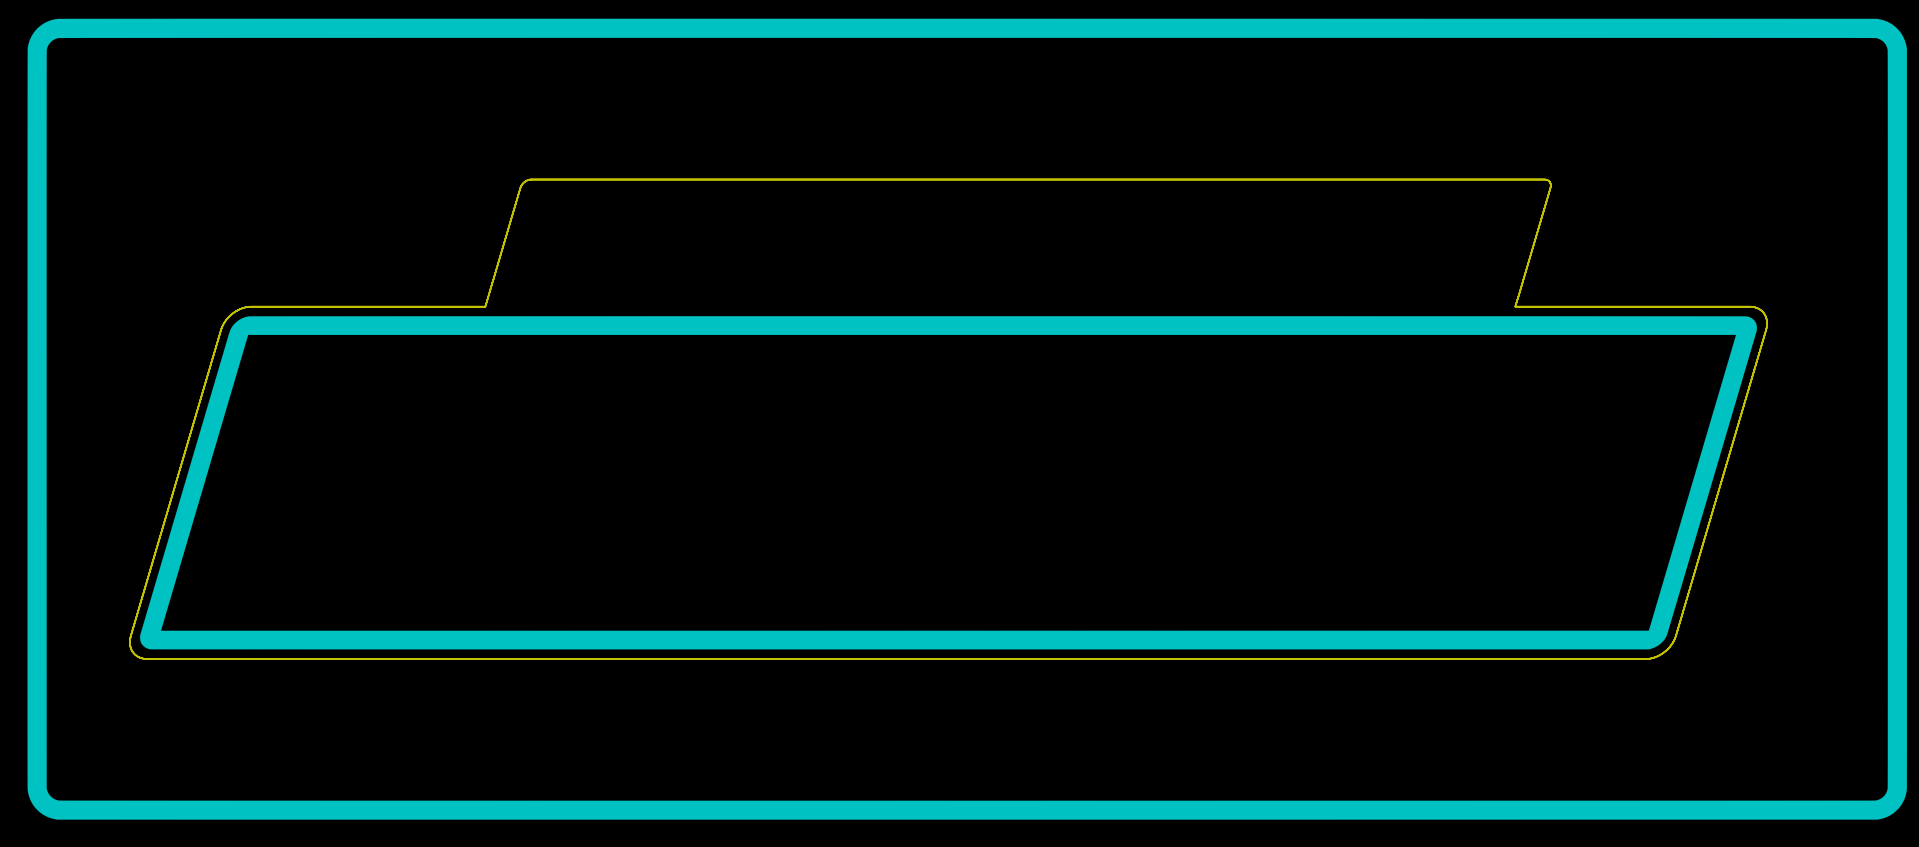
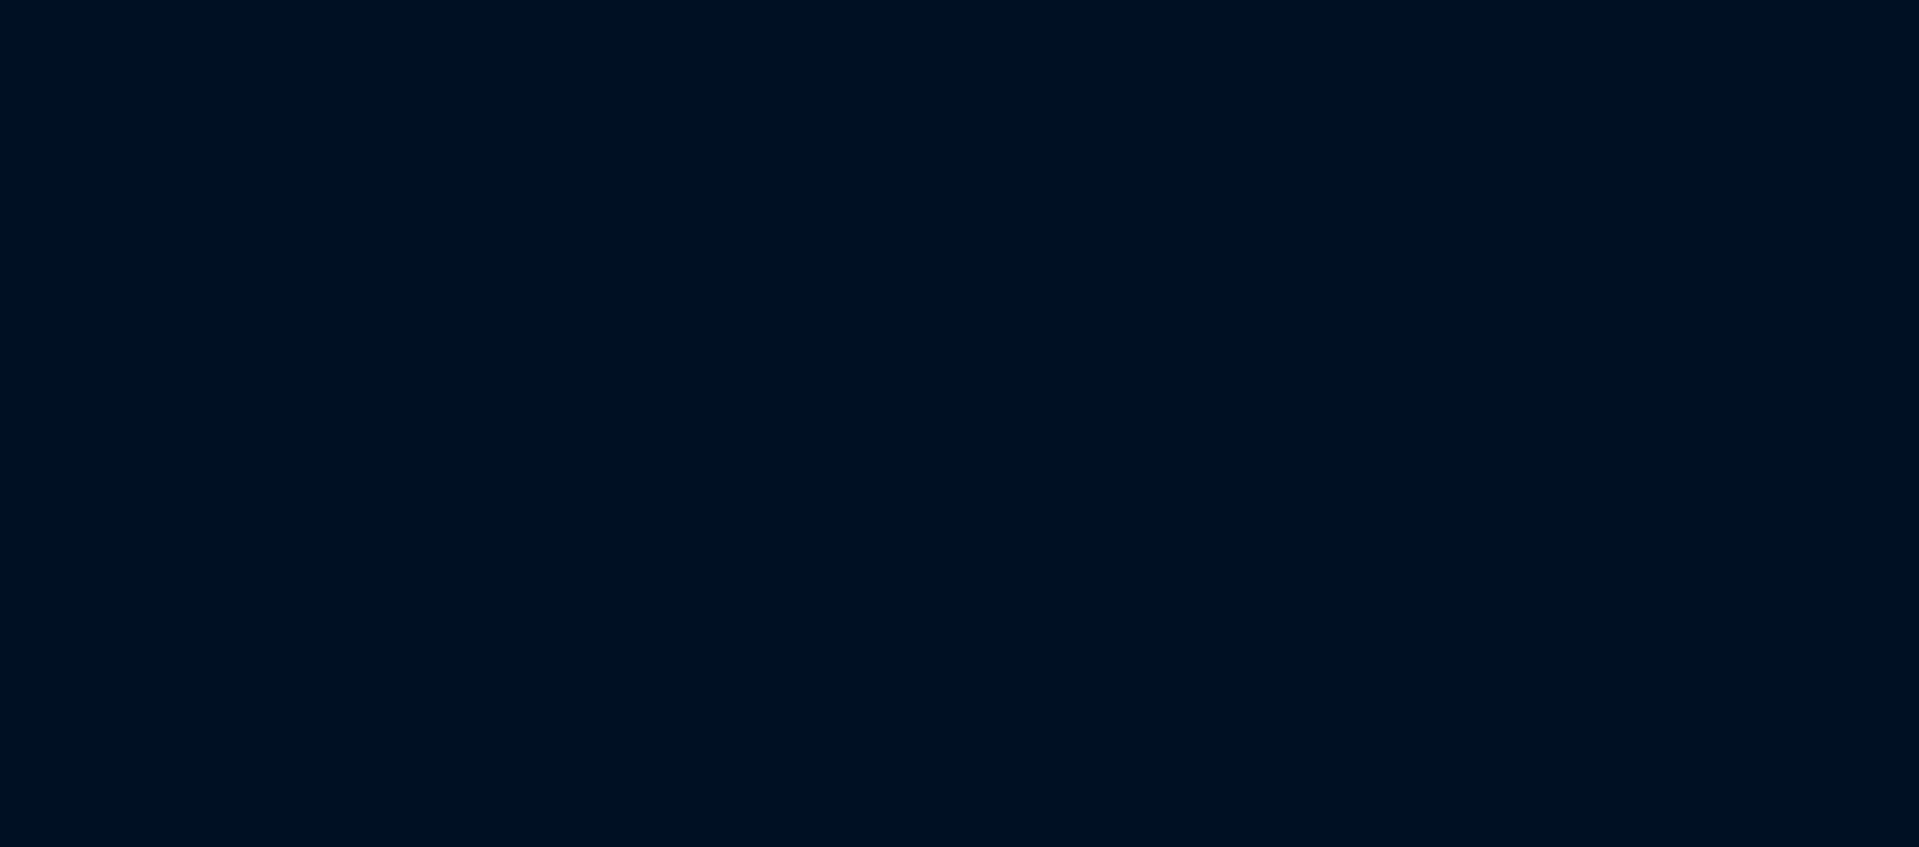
drawing: [27, 18, 1907, 820] -> none
board edge: (531, 179) (525, 181) (520, 187) (485, 306) (250, 306) (237, 310) (227, 318) (220, 330) (130, 636) (130, 646) (135, 655) (147, 659) (1650, 658) (1665, 650) (1675, 636) (1766, 325) (1763, 312) (1751, 306) (1515, 306) (1550, 187) (1549, 182) (1545, 179) (531, 179) -> none

